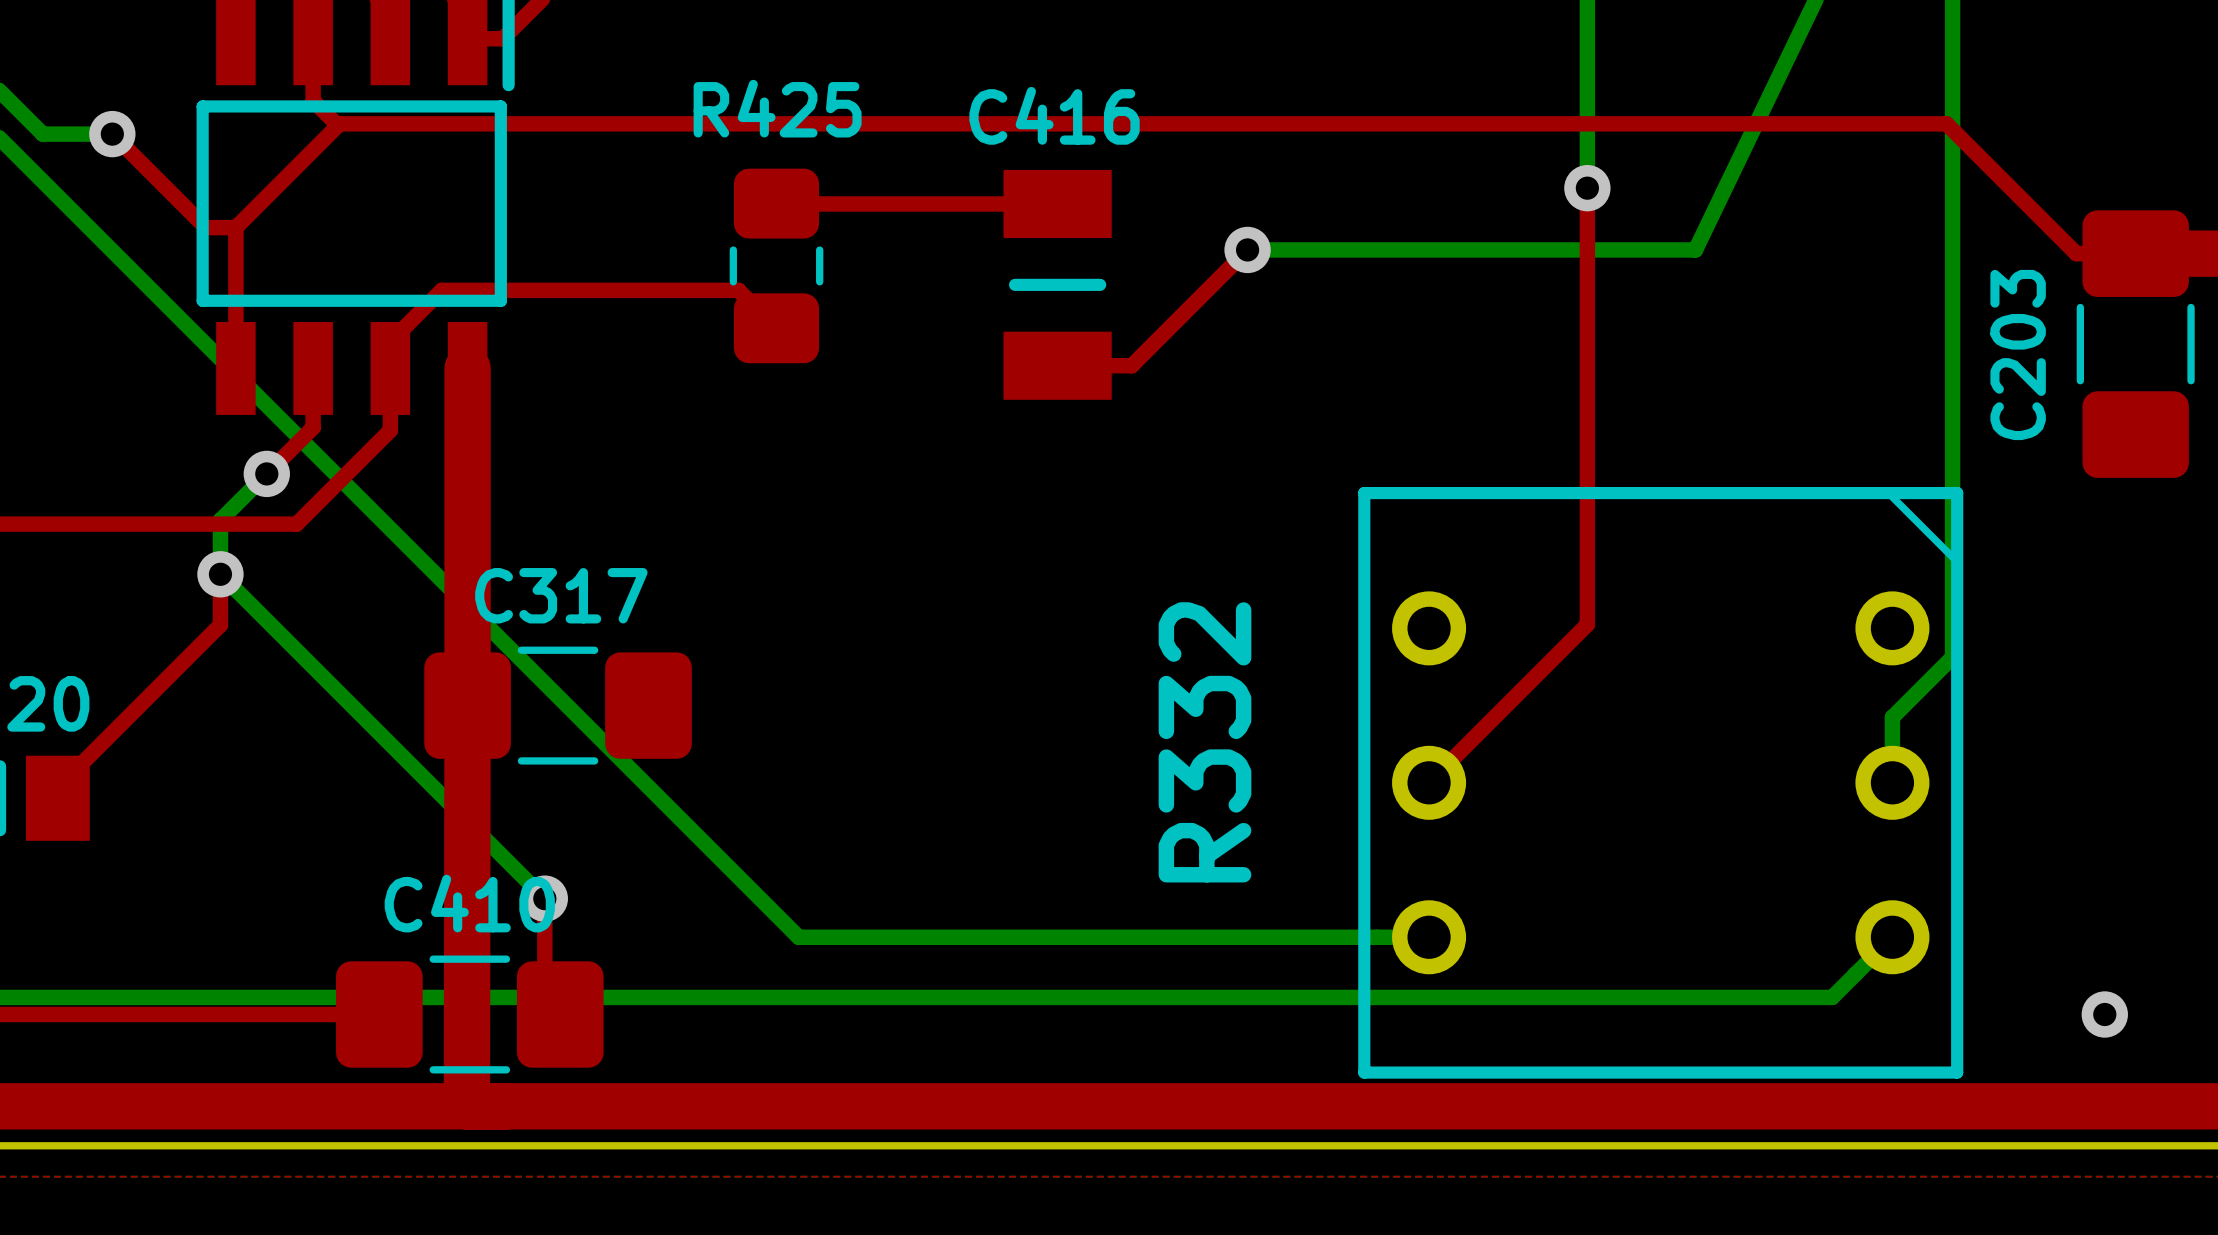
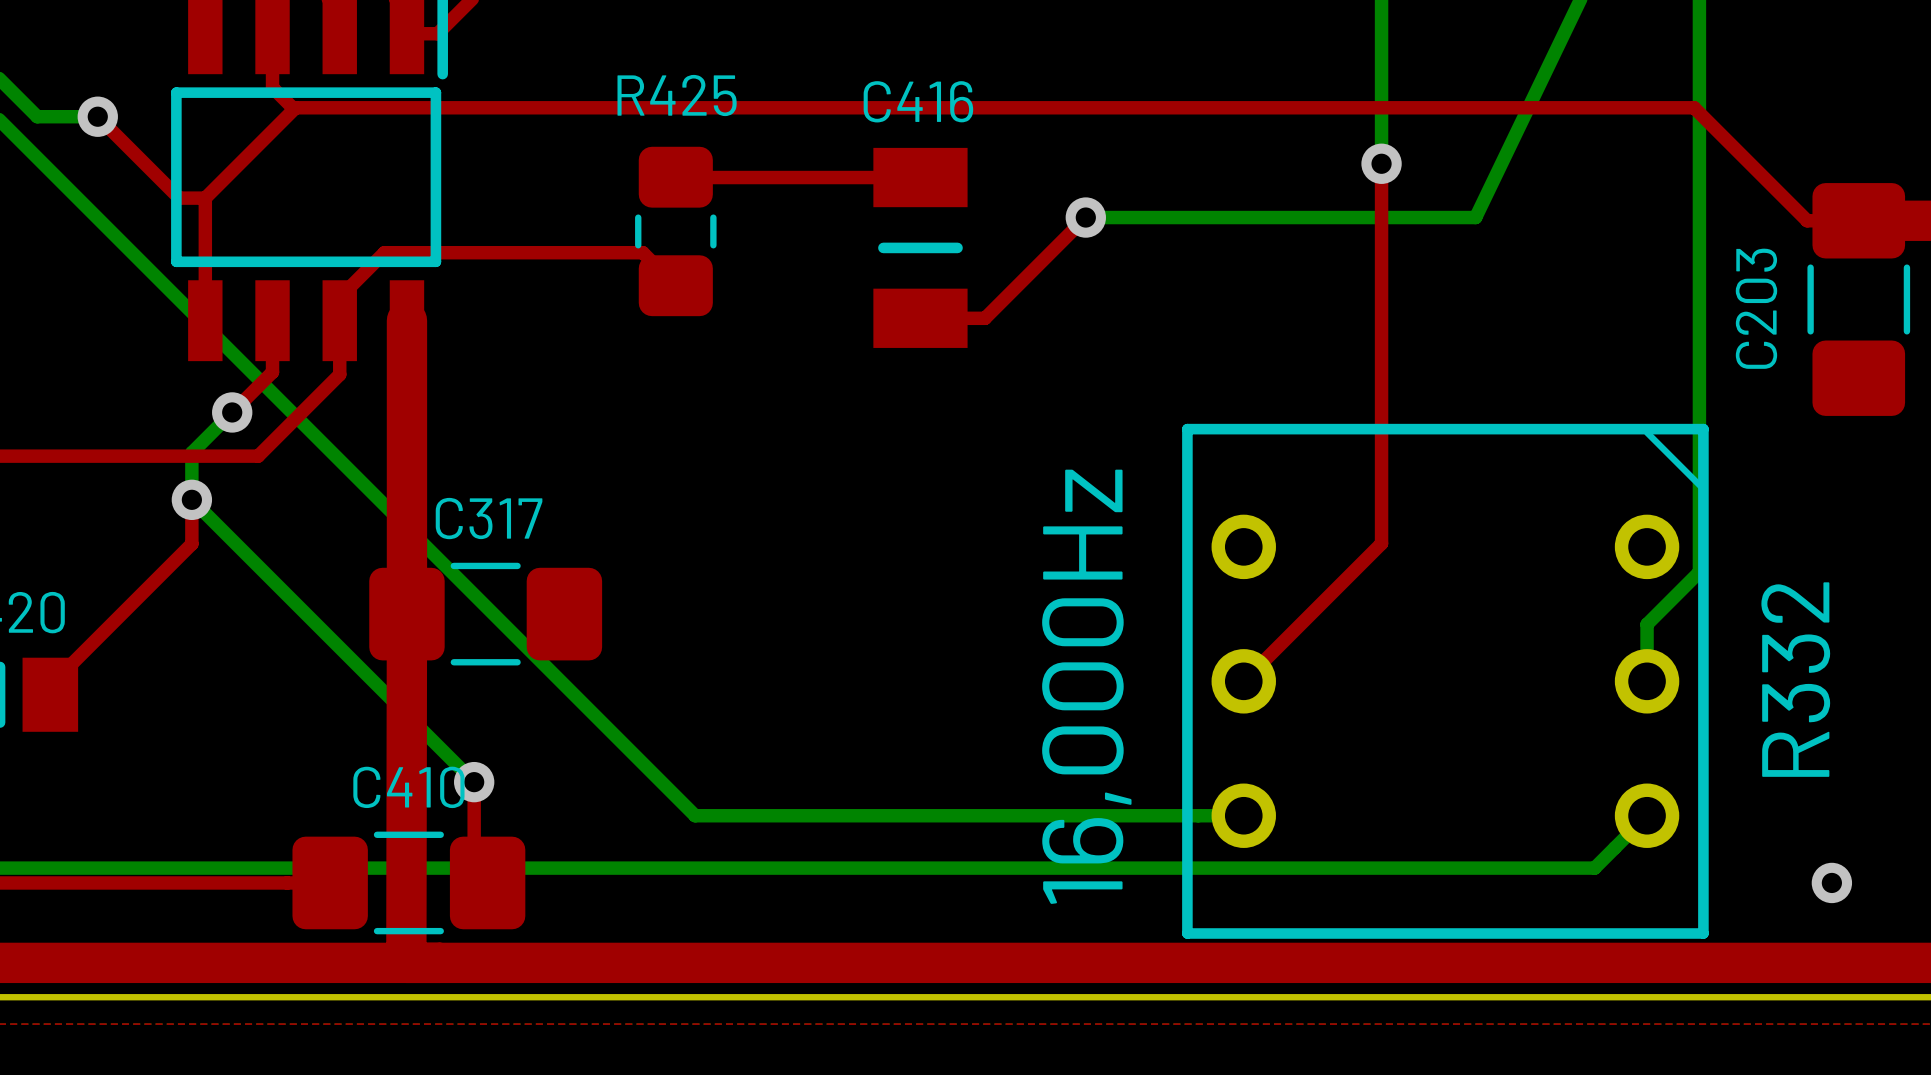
R332 name position: R332 (1205, 742) -> R332 (1795, 679)
text: none -> 16,000Hz (1086, 686)

